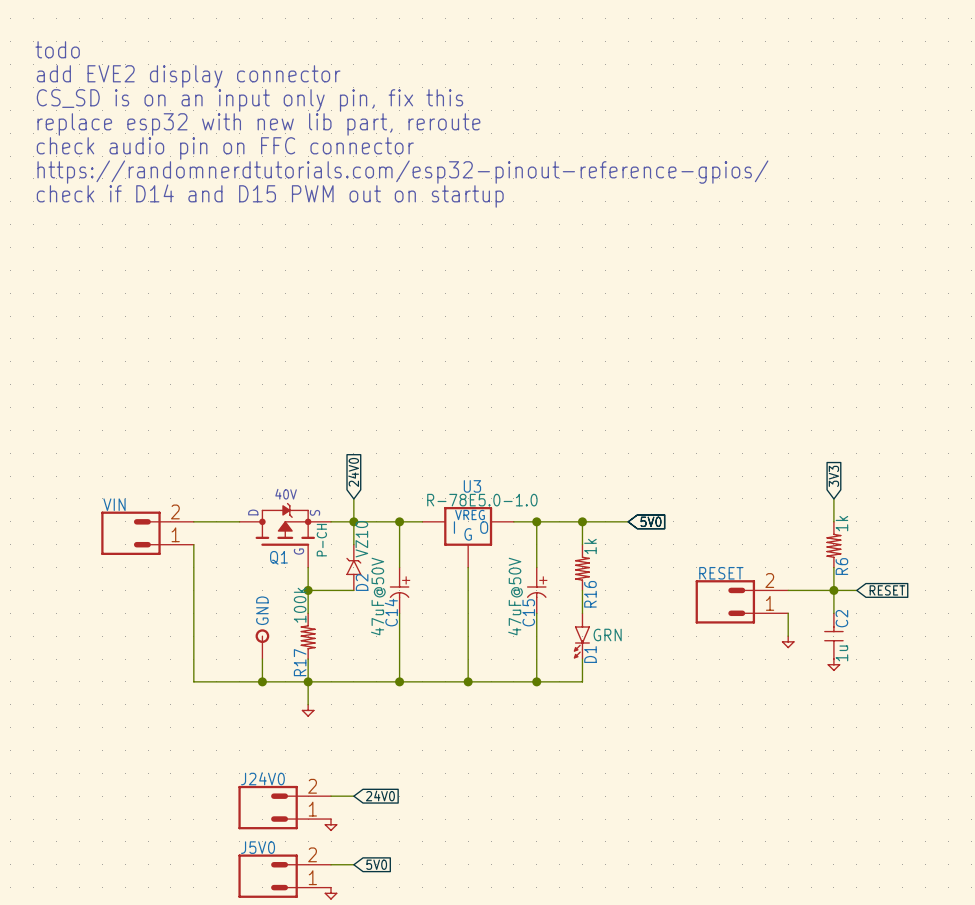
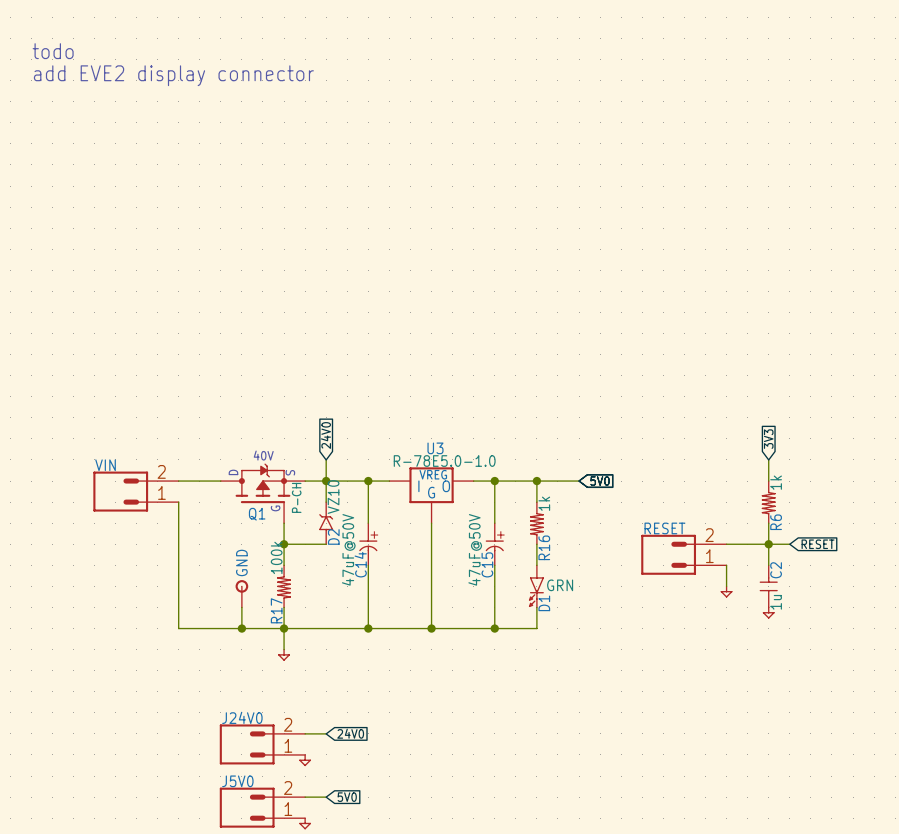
text: todo (57, 49) -> none
text: add EVE2 display connector (188, 76) -> todo (53, 51)
text: CS_SD is on an input only pin, fix this (250, 100) -> add EVE2 display connector (173, 75)
text: replace esp32 with new lib part, reroute (258, 124) -> none
text: check audio pin on FFC connector (225, 148) -> none
text: https://randomnerdtutorials.com/esp32-pinout-reference-gpios/ (402, 172) -> none
text: check if D14 and D15 PWM out on startup (270, 196) -> none

